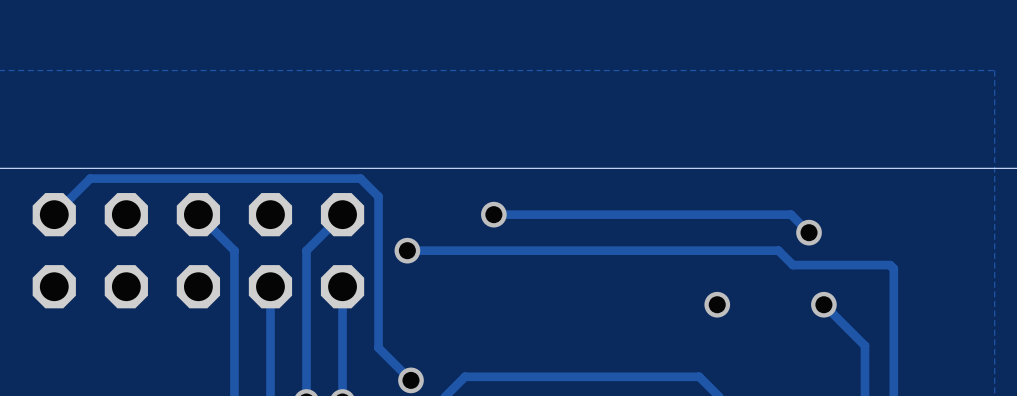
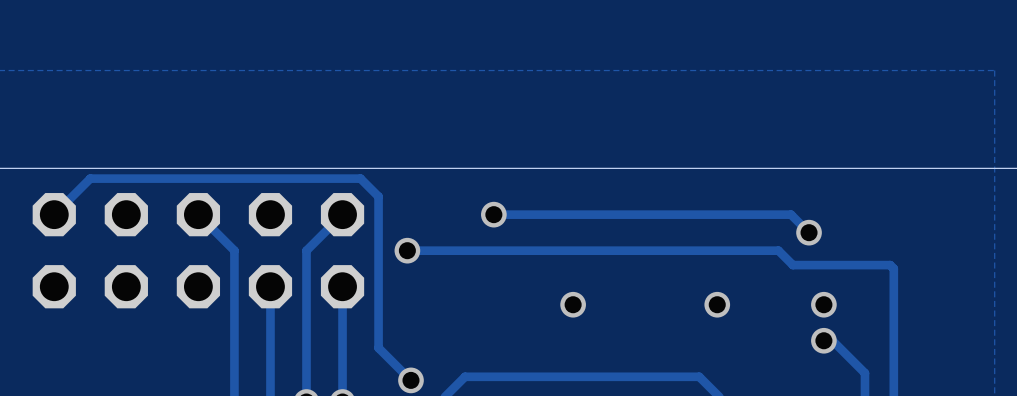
via: none -> (573, 304)
track: (823, 304) (864, 345) (864, 373) -> (823, 340) (832, 340) (864, 373)
via: none -> (823, 340)

